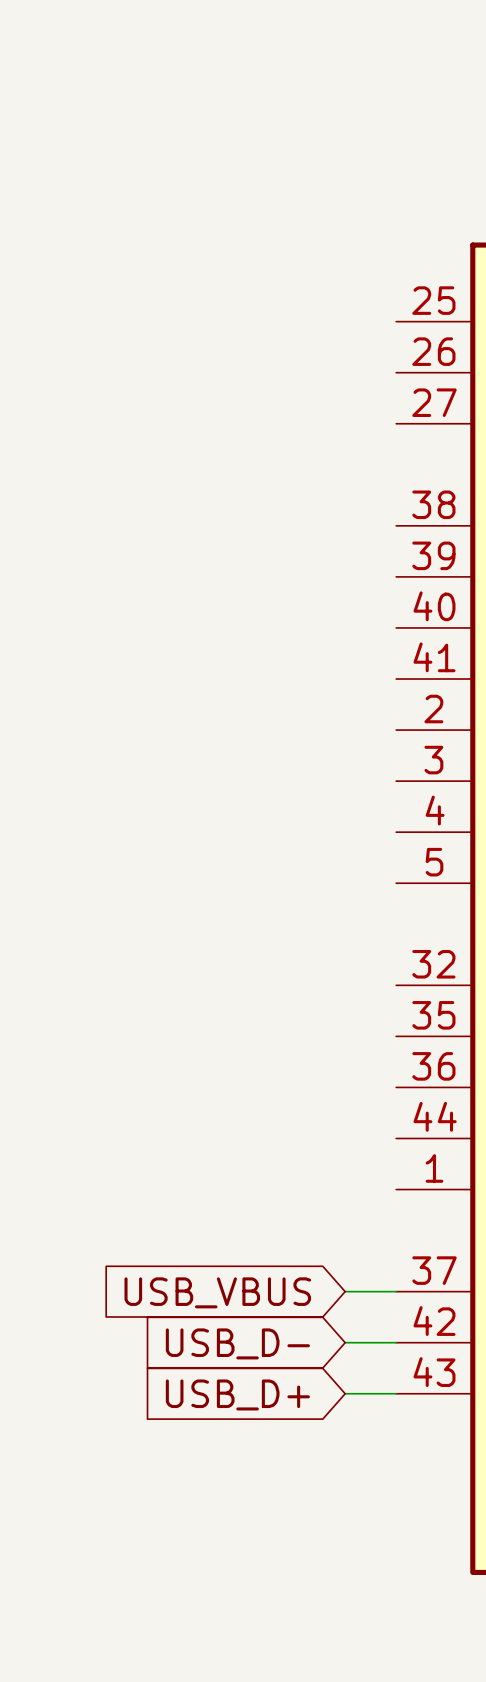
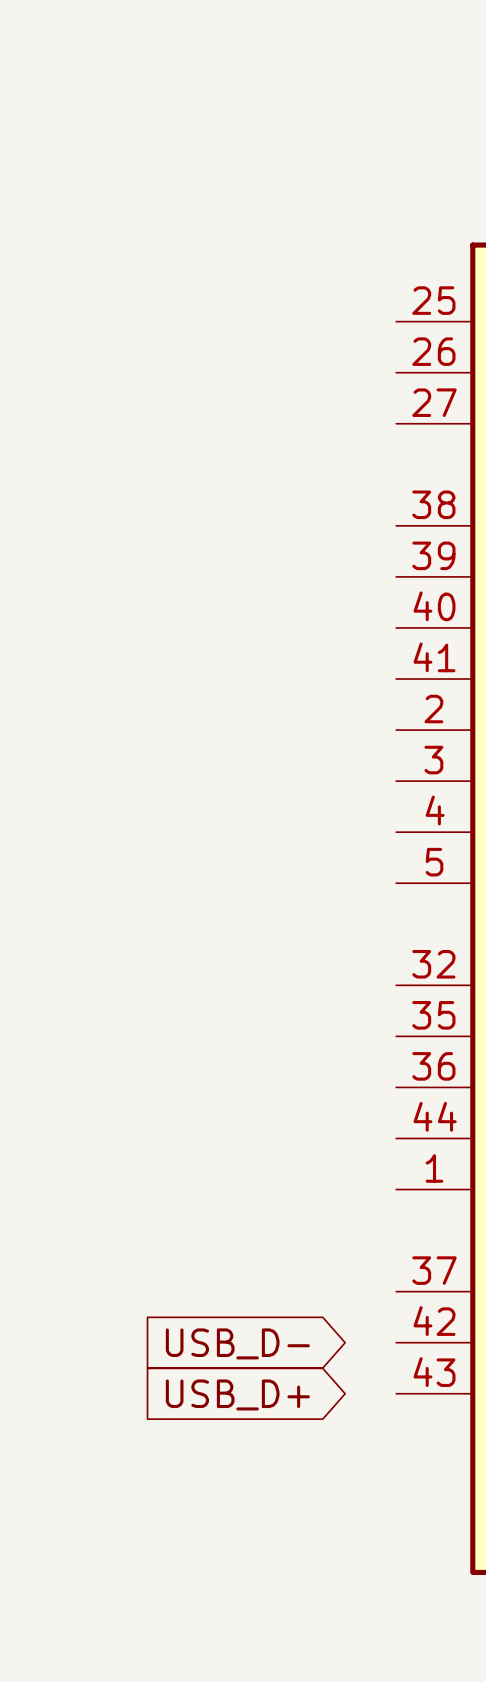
wire: (345, 1291) (396, 1291) -> none
global label: USB_VBUS (217, 1292) -> none
wire: (345, 1342) (396, 1342) -> none
wire: (345, 1393) (396, 1393) -> none

